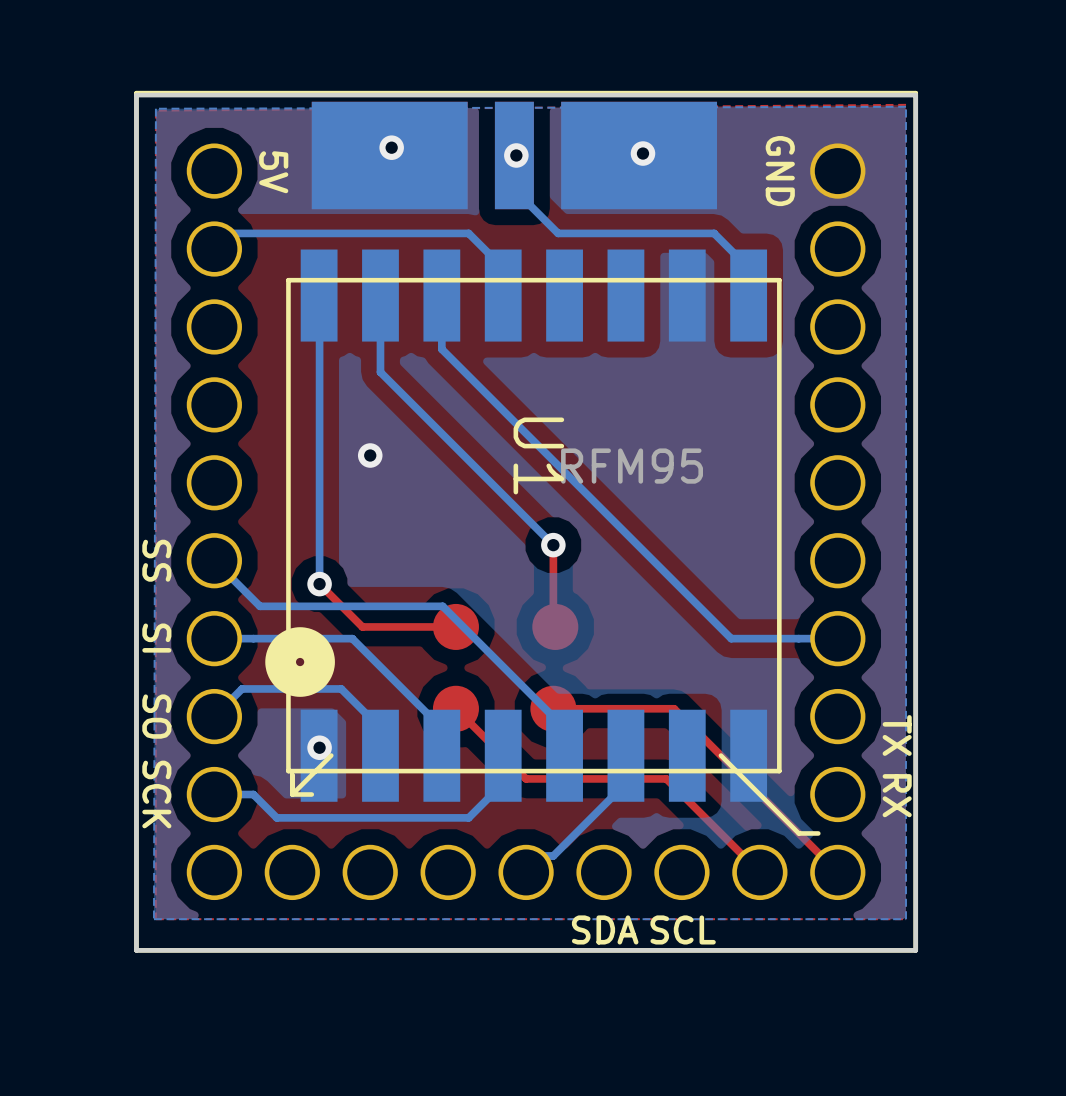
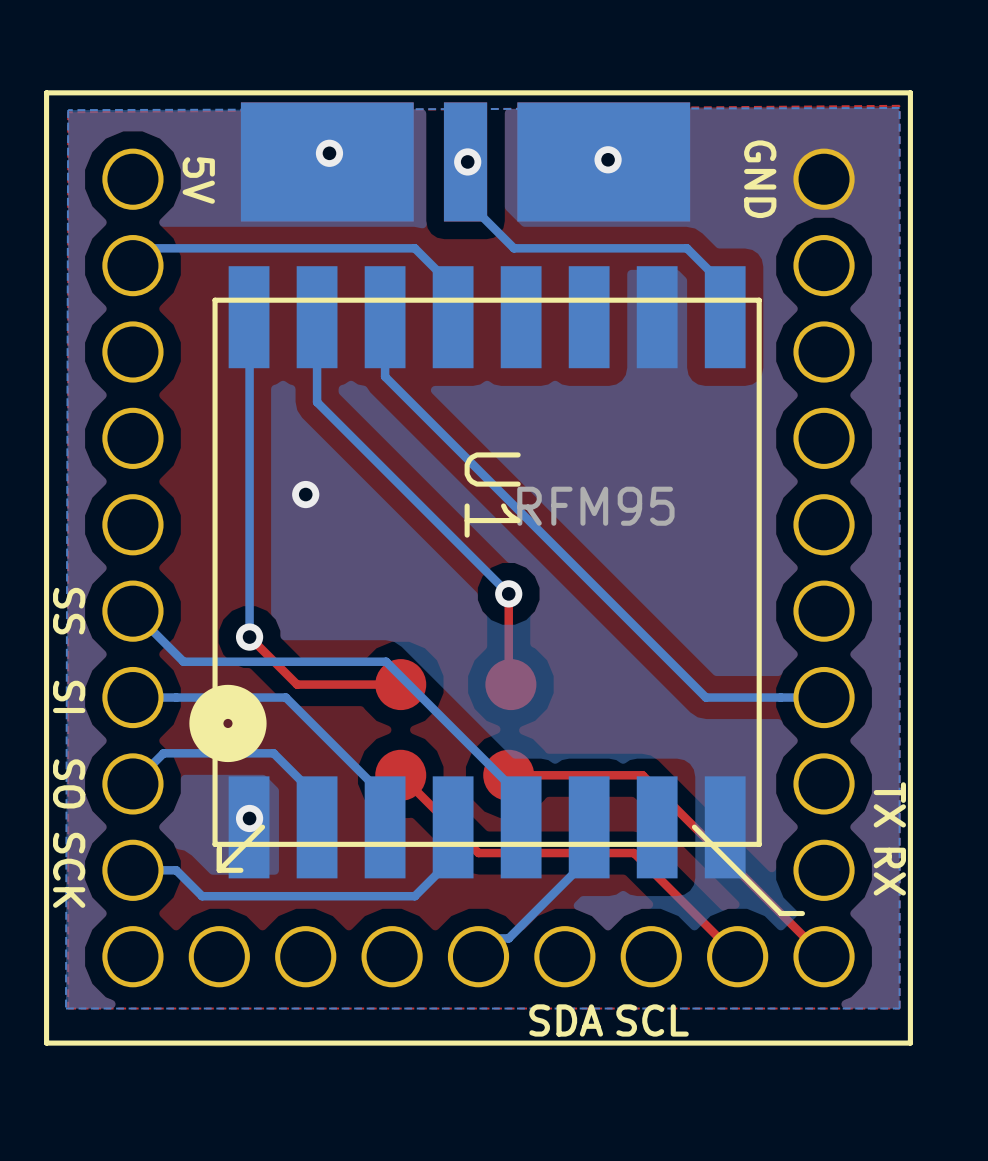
board edge: (915, 95) (915, 950) (136, 950) (136, 95) (915, 95) -> none

